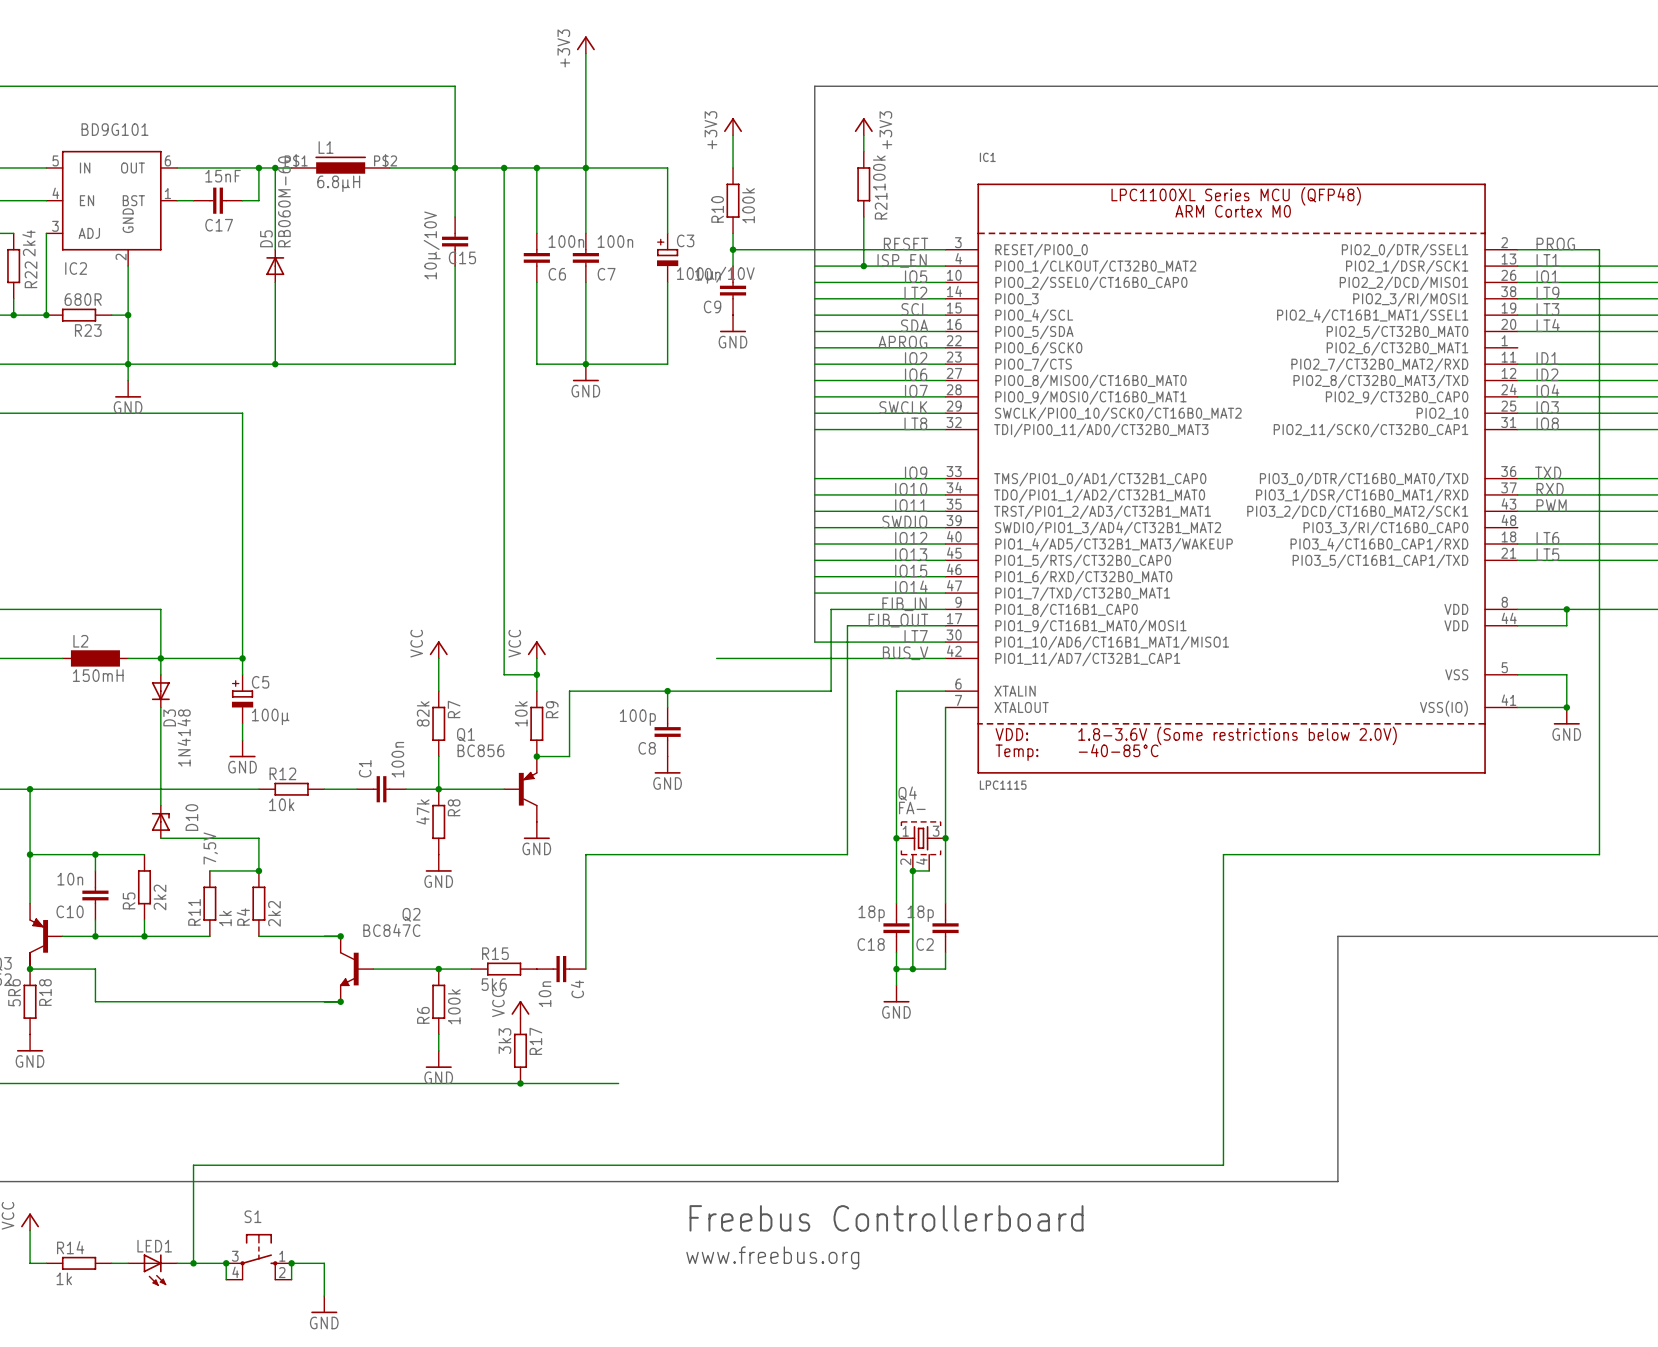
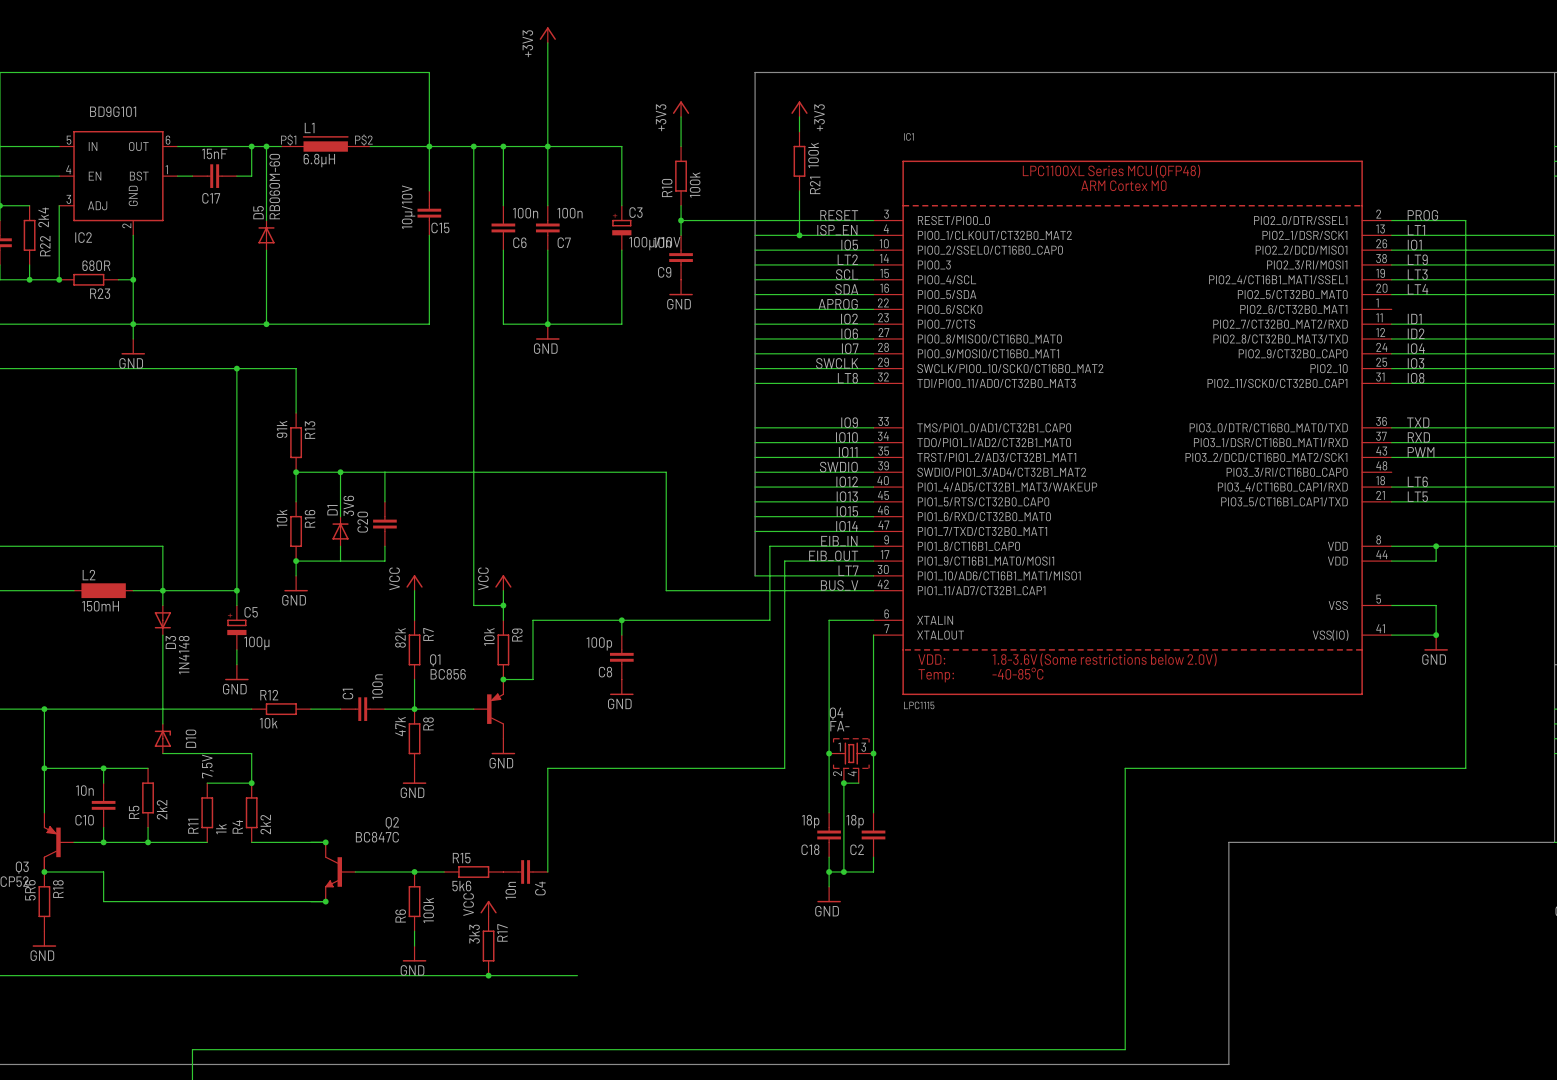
wire: none -> (236, 368) (296, 368) (296, 413)
junction: none -> (236, 368)
R13: none -> 91k (296, 442)
junction: none -> (296, 472)
wire: none -> (340, 472) (340, 516)
junction: none -> (340, 472)
wire: none -> (384, 472) (384, 501)
wire: none -> (296, 501) (296, 472) (666, 472) (666, 590)
C20: none -> (384, 524)
R16: none -> 10k (296, 531)
D1: none -> 3V6 (340, 531)
wire: none -> (340, 546) (340, 561)
wire: none -> (384, 546) (384, 561) (296, 561) (296, 575)
junction: none -> (296, 561)
power symbol: none -> GND (296, 583)

